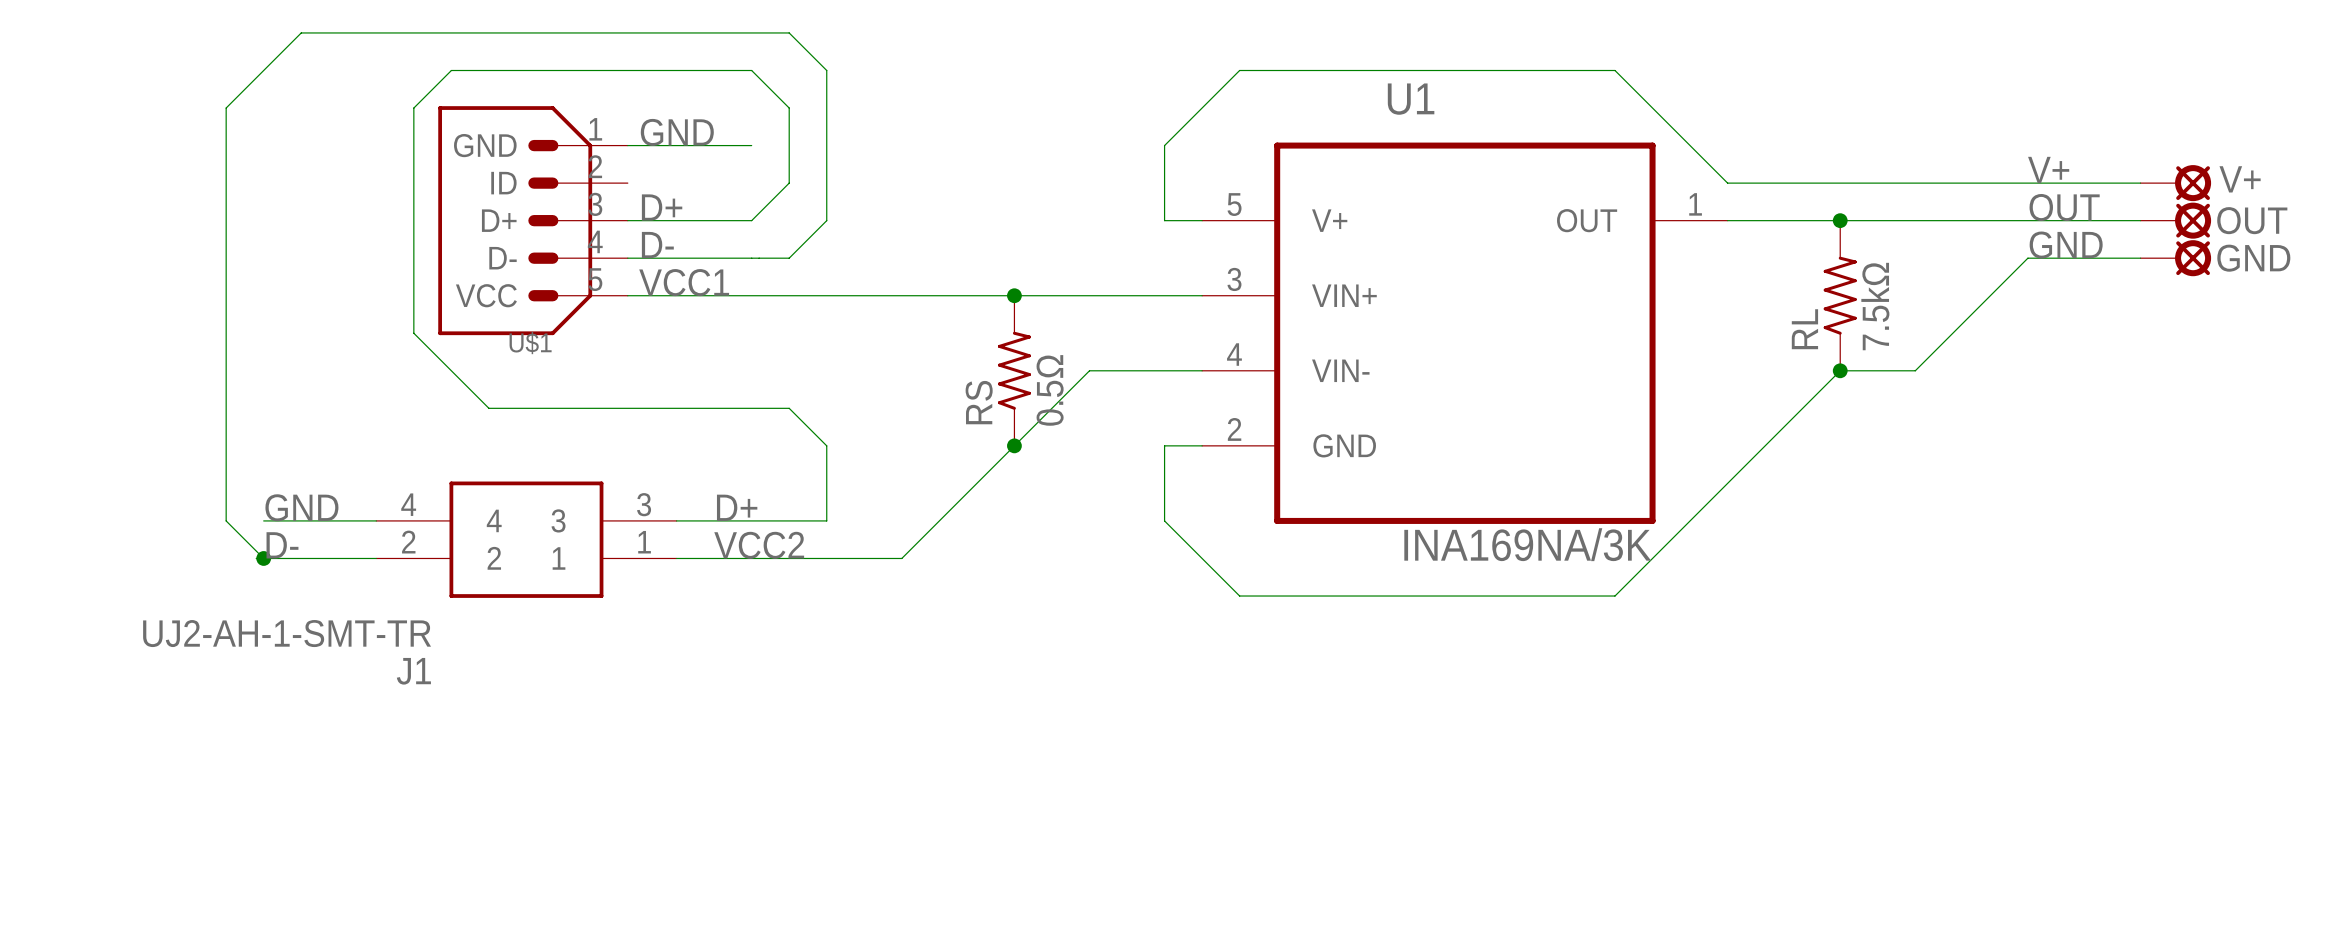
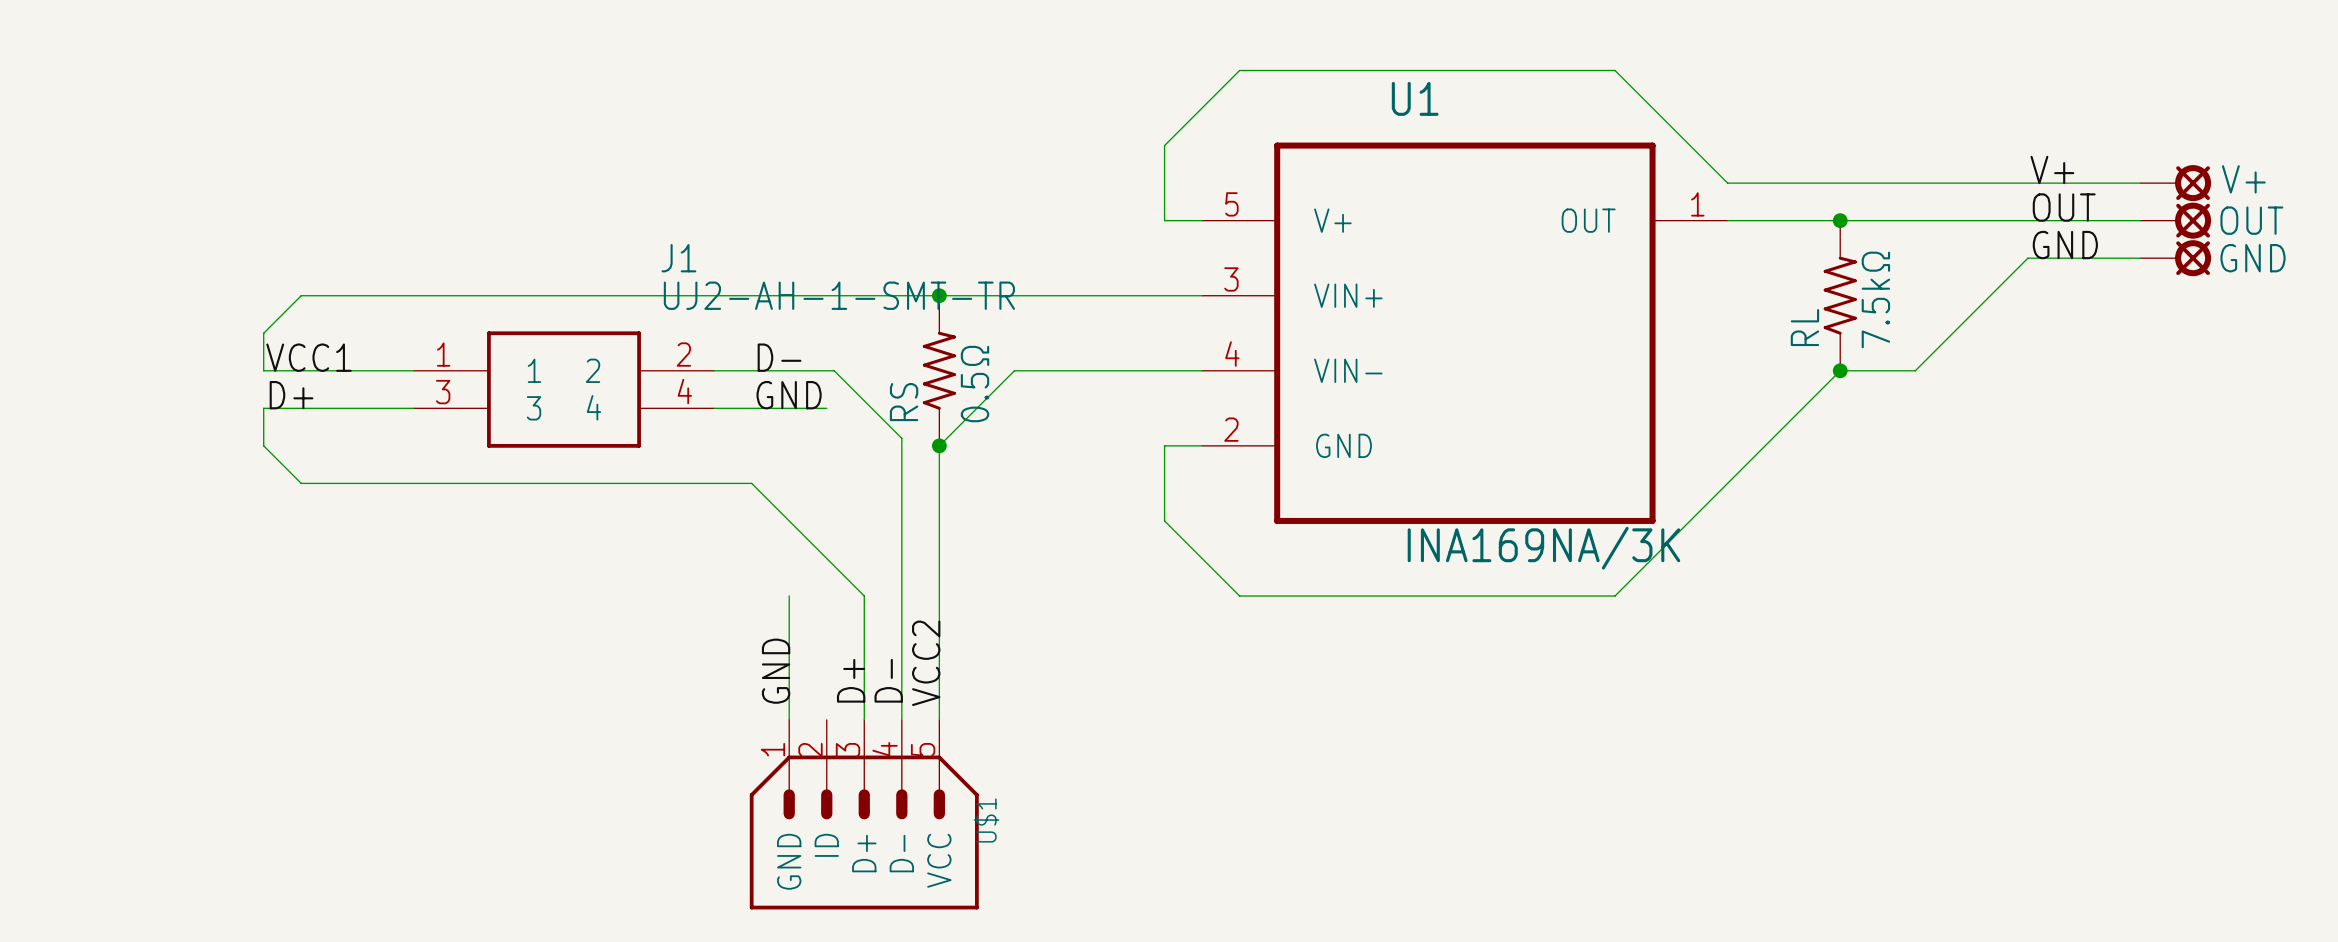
label: GND (677, 132) -> none
wire: (627, 145) (751, 145) -> none
label: D+ (662, 207) -> none
U$1 rotation: 0° (515, 220) -> 90° counterclockwise (864, 832)
U$1 position: (533, 220) -> (864, 814)
wire: (627, 220) (751, 220) (789, 183) (789, 108) (751, 70) (451, 70) (413, 108) (413, 333) (488, 408) (714, 408) -> none
label position: D- (657, 245) -> D- (779, 357)
wire: (627, 258) (789, 258) (826, 220) (826, 70) (789, 32) (301, 32) (226, 108) (226, 520) (263, 558) -> none
label: VCC1 (684, 282) -> none
wire: none -> (627, 295) (301, 295) (263, 333) (263, 370) (413, 370)
junction position: (1014, 295) -> (939, 295)
label: none -> VCC1 (309, 357)
wire: none -> (714, 370) (834, 370) (901, 438) (901, 719)
RS position: (1014, 370) -> (939, 370)
wire: (1089, 370) (901, 558) (676, 558) -> (1089, 370) (1014, 370) (939, 445) (939, 719)
label: none -> D+ (291, 395)
label: none -> GND (789, 395)
wire: none -> (413, 408) (263, 408) (263, 445) (301, 483) (751, 483) (864, 596) (864, 719)
wire: (789, 408) (826, 445) (826, 520) (676, 520) -> (789, 408) (826, 408)
junction position: (1014, 445) -> (939, 445)
label: GND (301, 507) -> none
label: D+ (737, 507) -> none
wire: (263, 520) (376, 520) -> none
J1 rotation: 0° (526, 539) -> 180° (563, 389)
label: D- (282, 545) -> none
label rotation: 0° (759, 545) -> 90° counterclockwise (926, 663)
label position: VCC2 (759, 545) -> VCC2 (926, 663)
wire: (256, 558) (376, 558) -> none
junction: (263, 558) -> none
wire: none -> (789, 596) (789, 719)
label: none -> GND (776, 671)
label: none -> D+ (851, 680)
label: none -> D- (888, 680)

